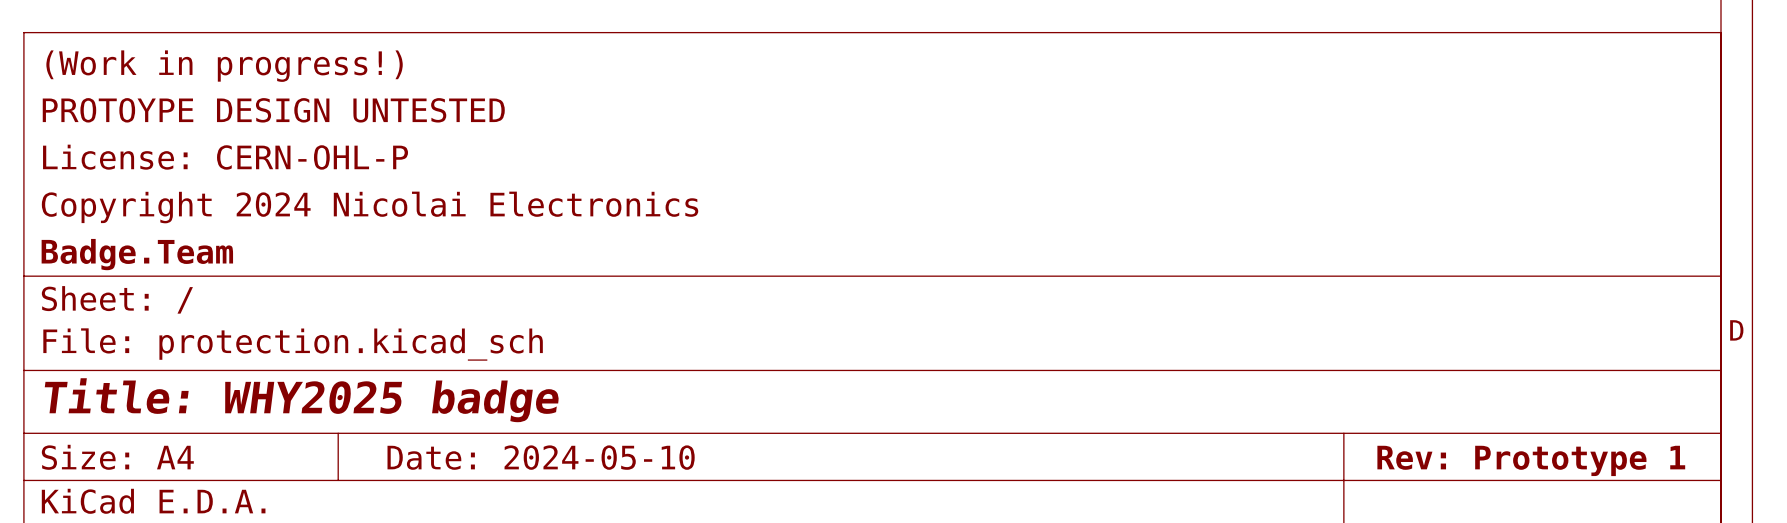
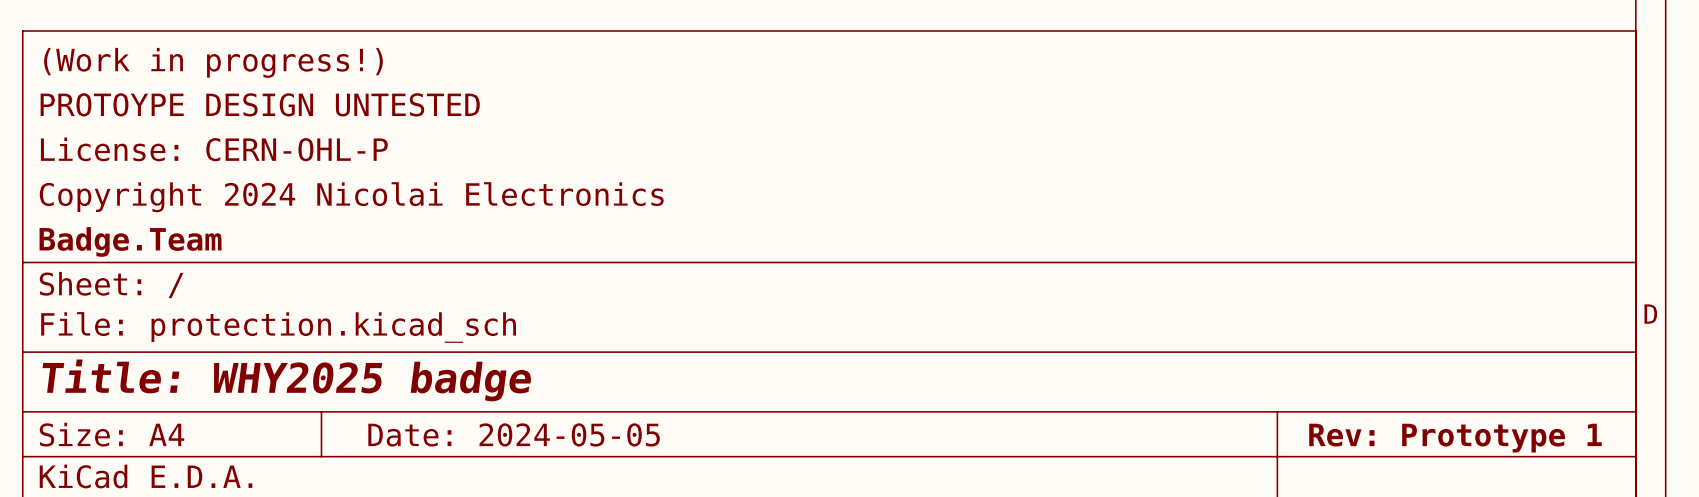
title block: Date: 2024-05-10 (541, 457) -> Date: 2024-05-05 (514, 434)

